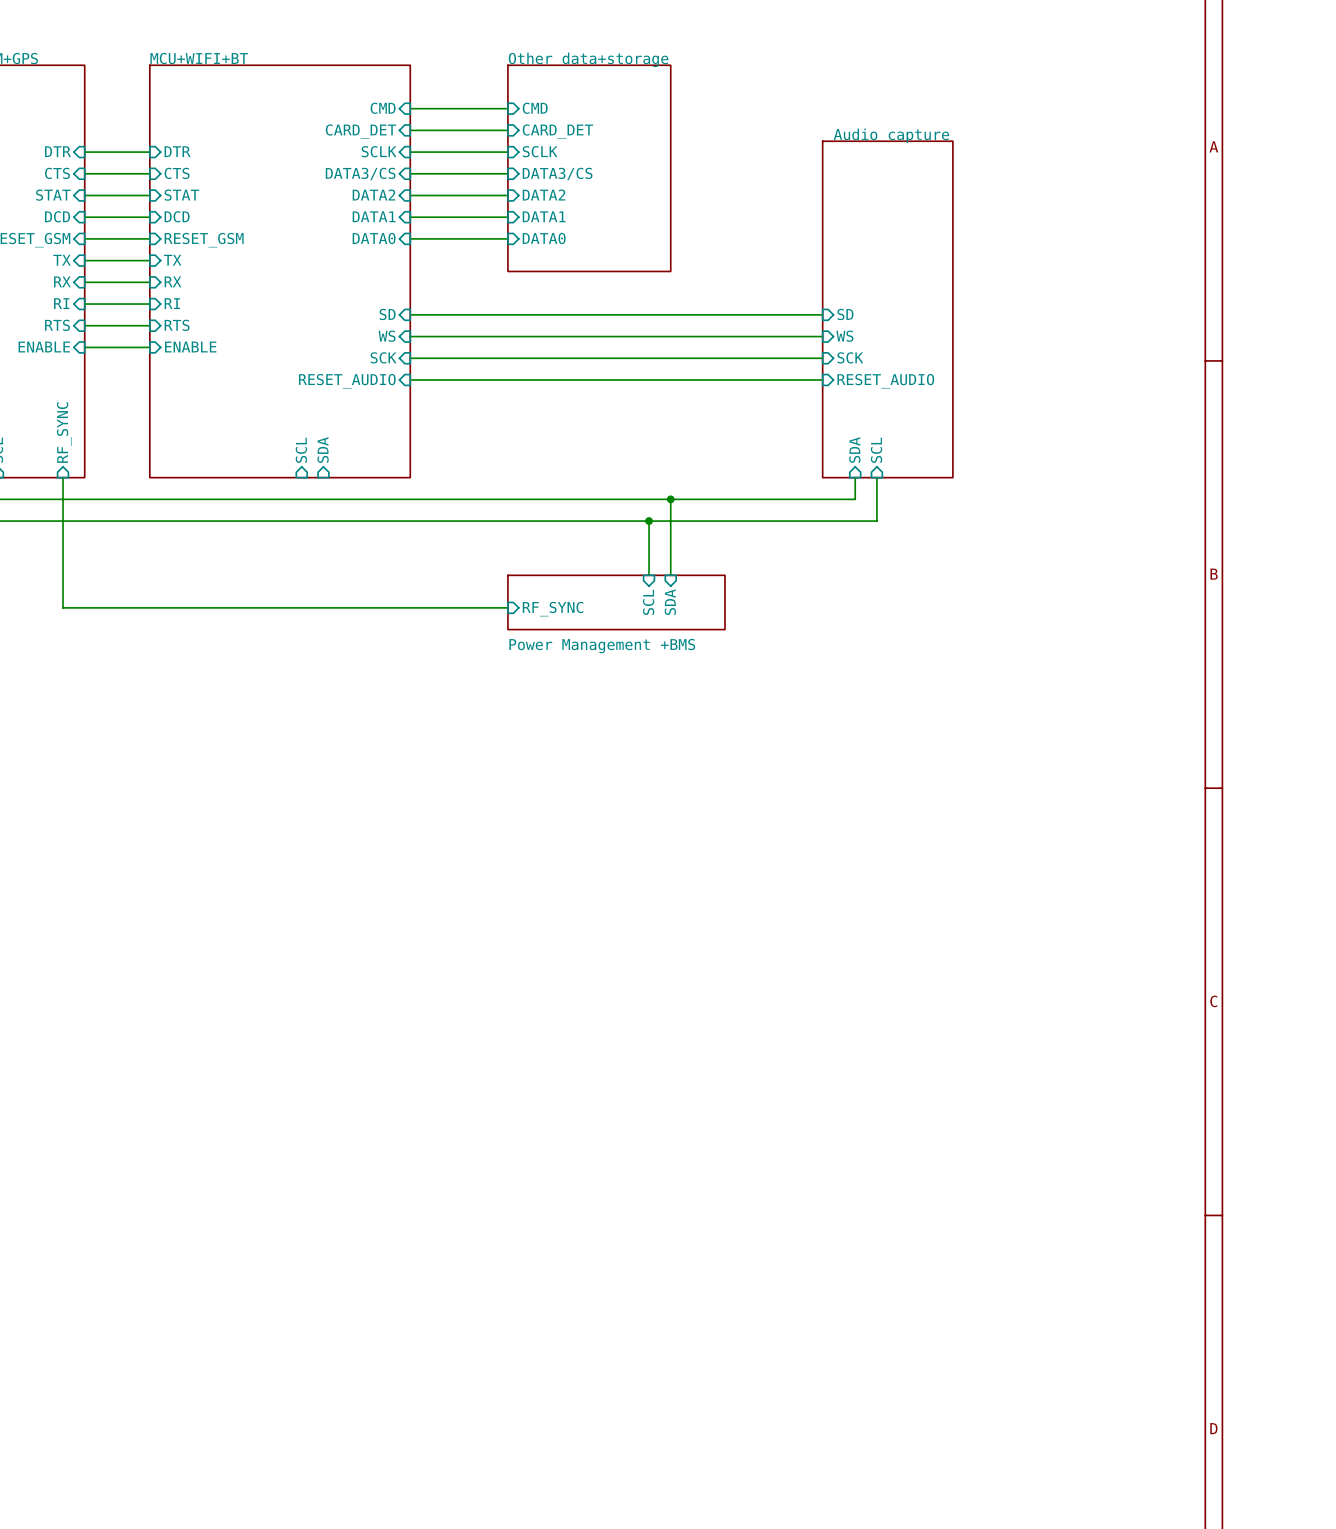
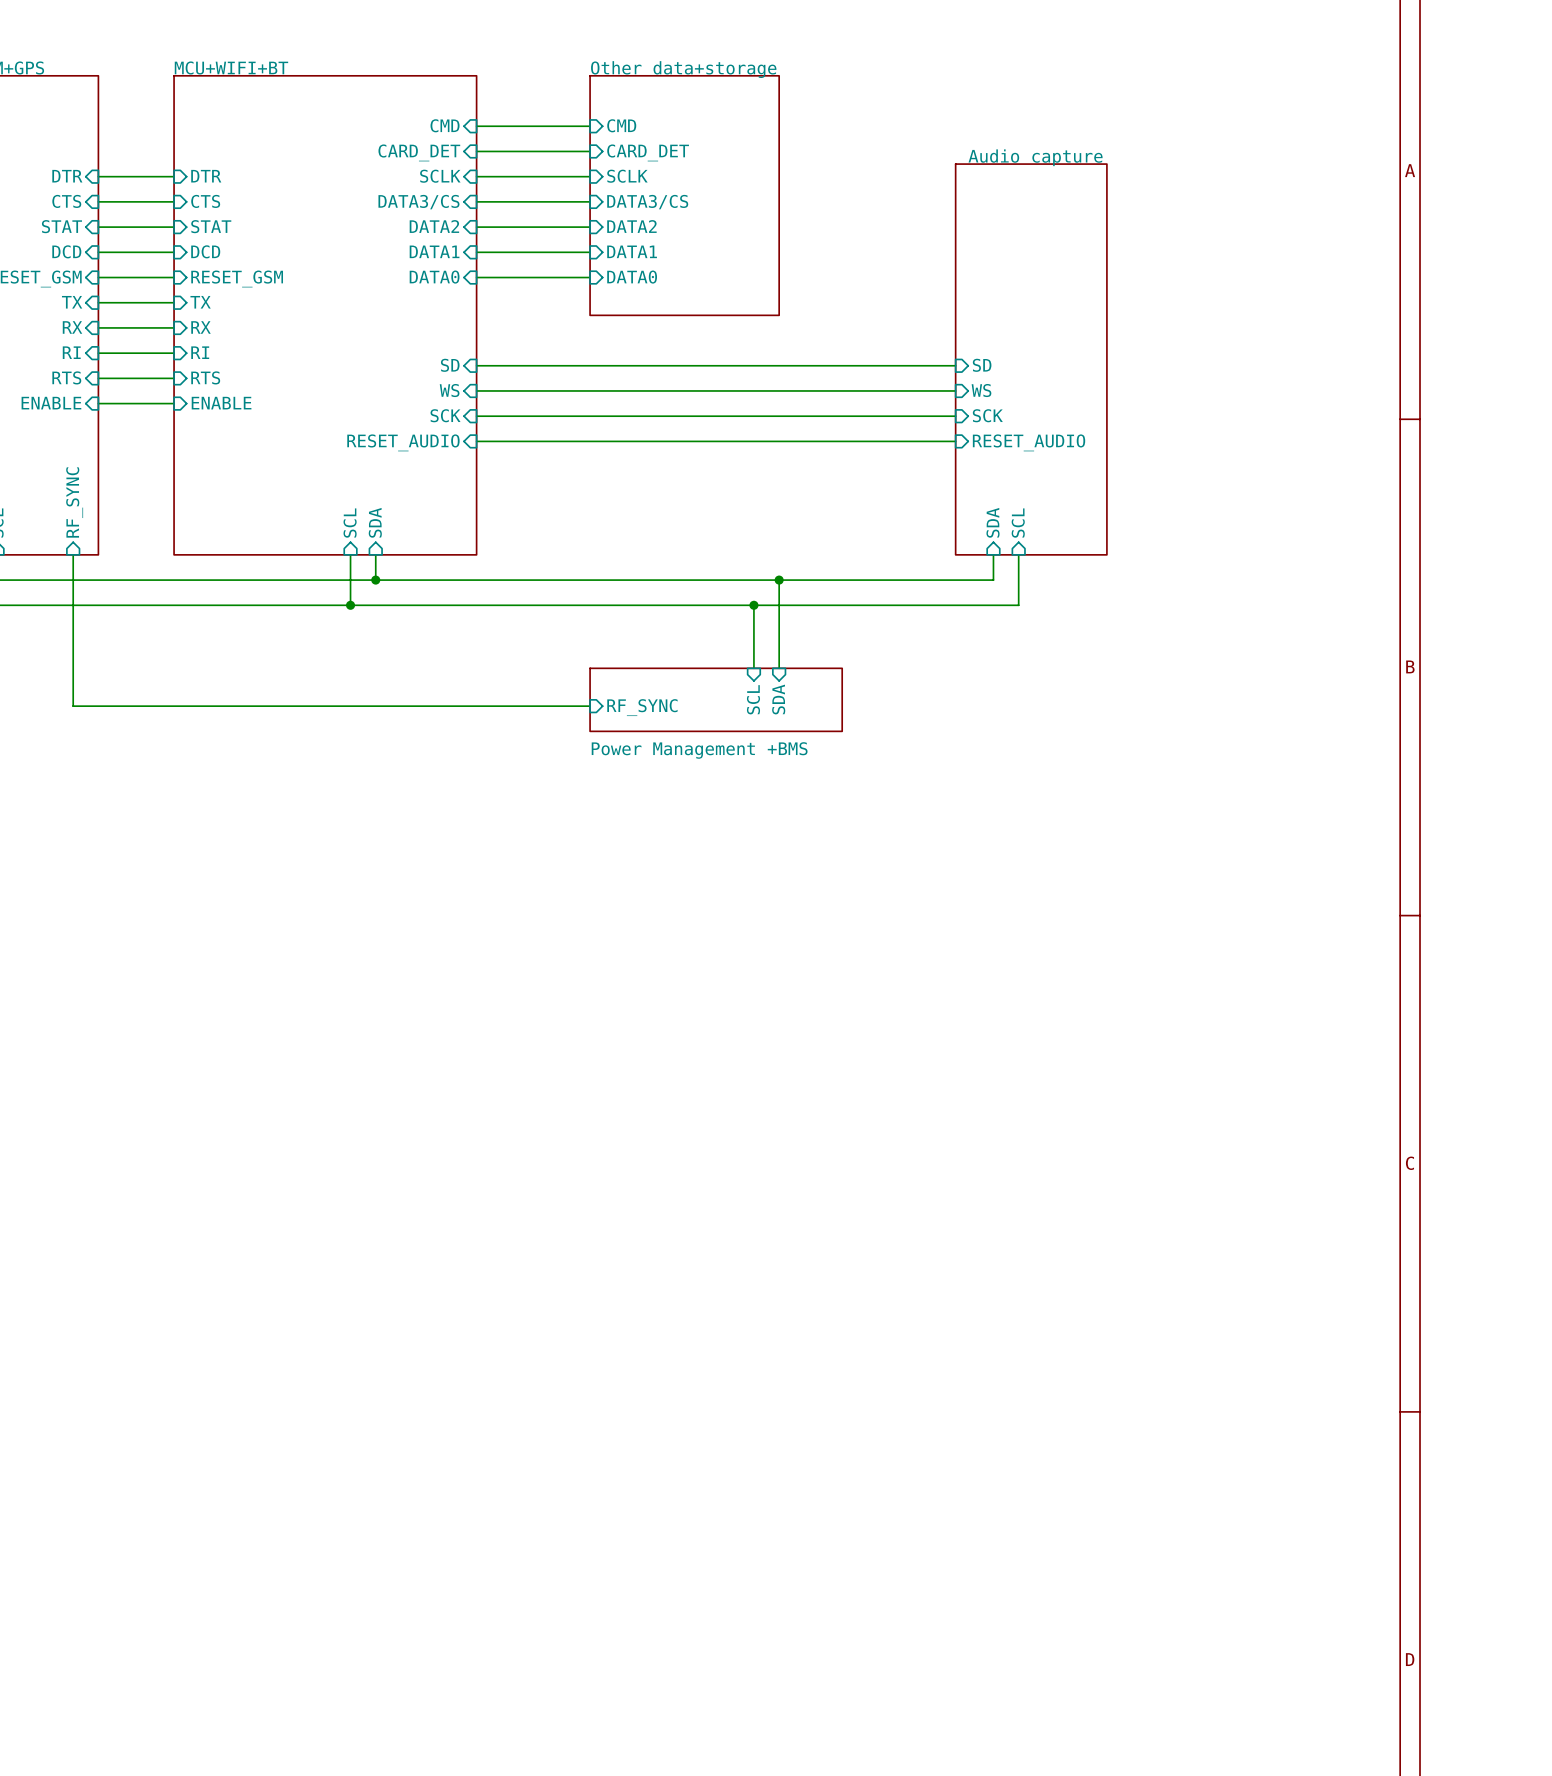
wire: none -> (350, 554) (350, 605)
wire: none -> (375, 554) (375, 580)
junction: none -> (375, 580)
junction: none -> (350, 605)

